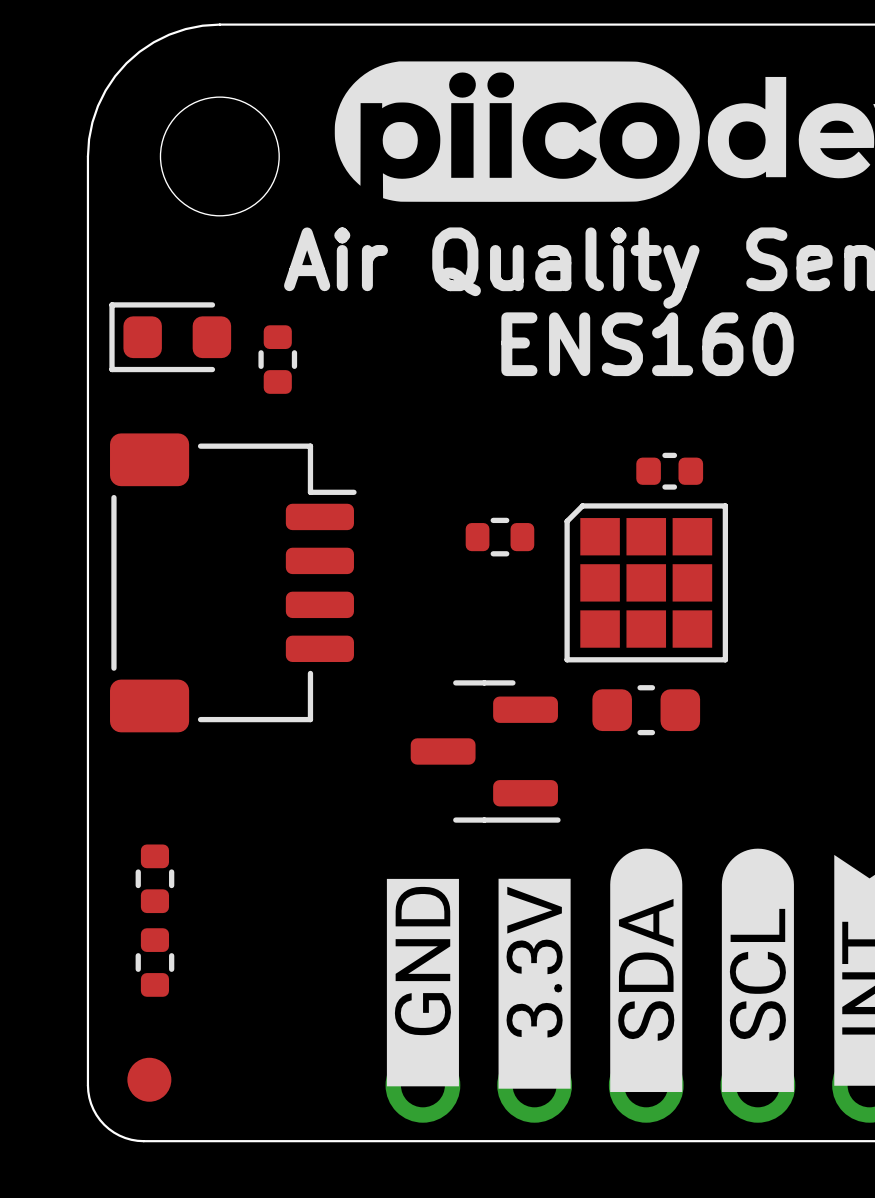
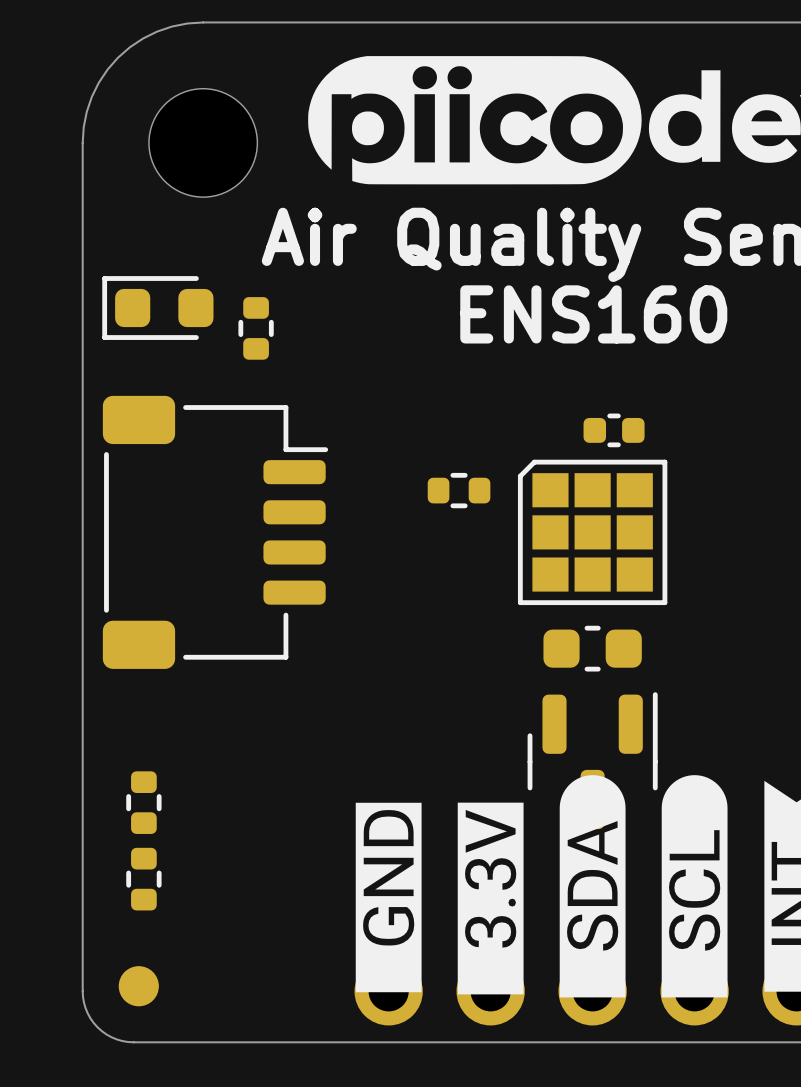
part rotation: 0° (485, 751) -> 90° counterclockwise (592, 760)
part position: (485, 751) -> (592, 760)

